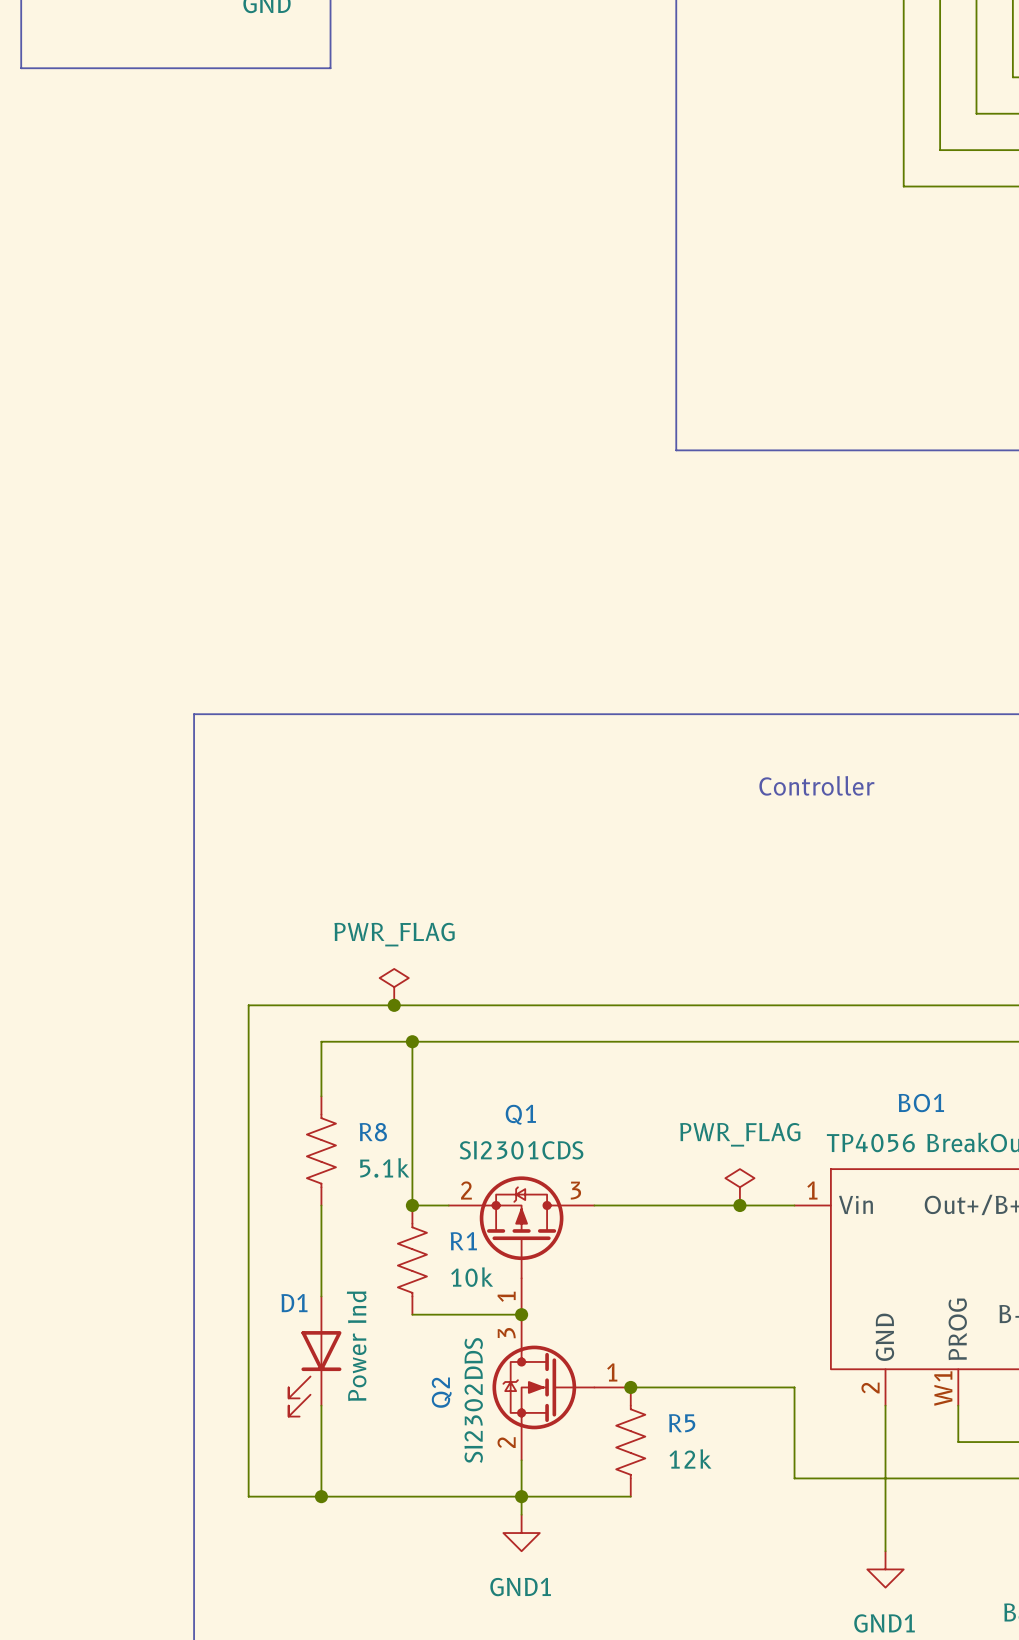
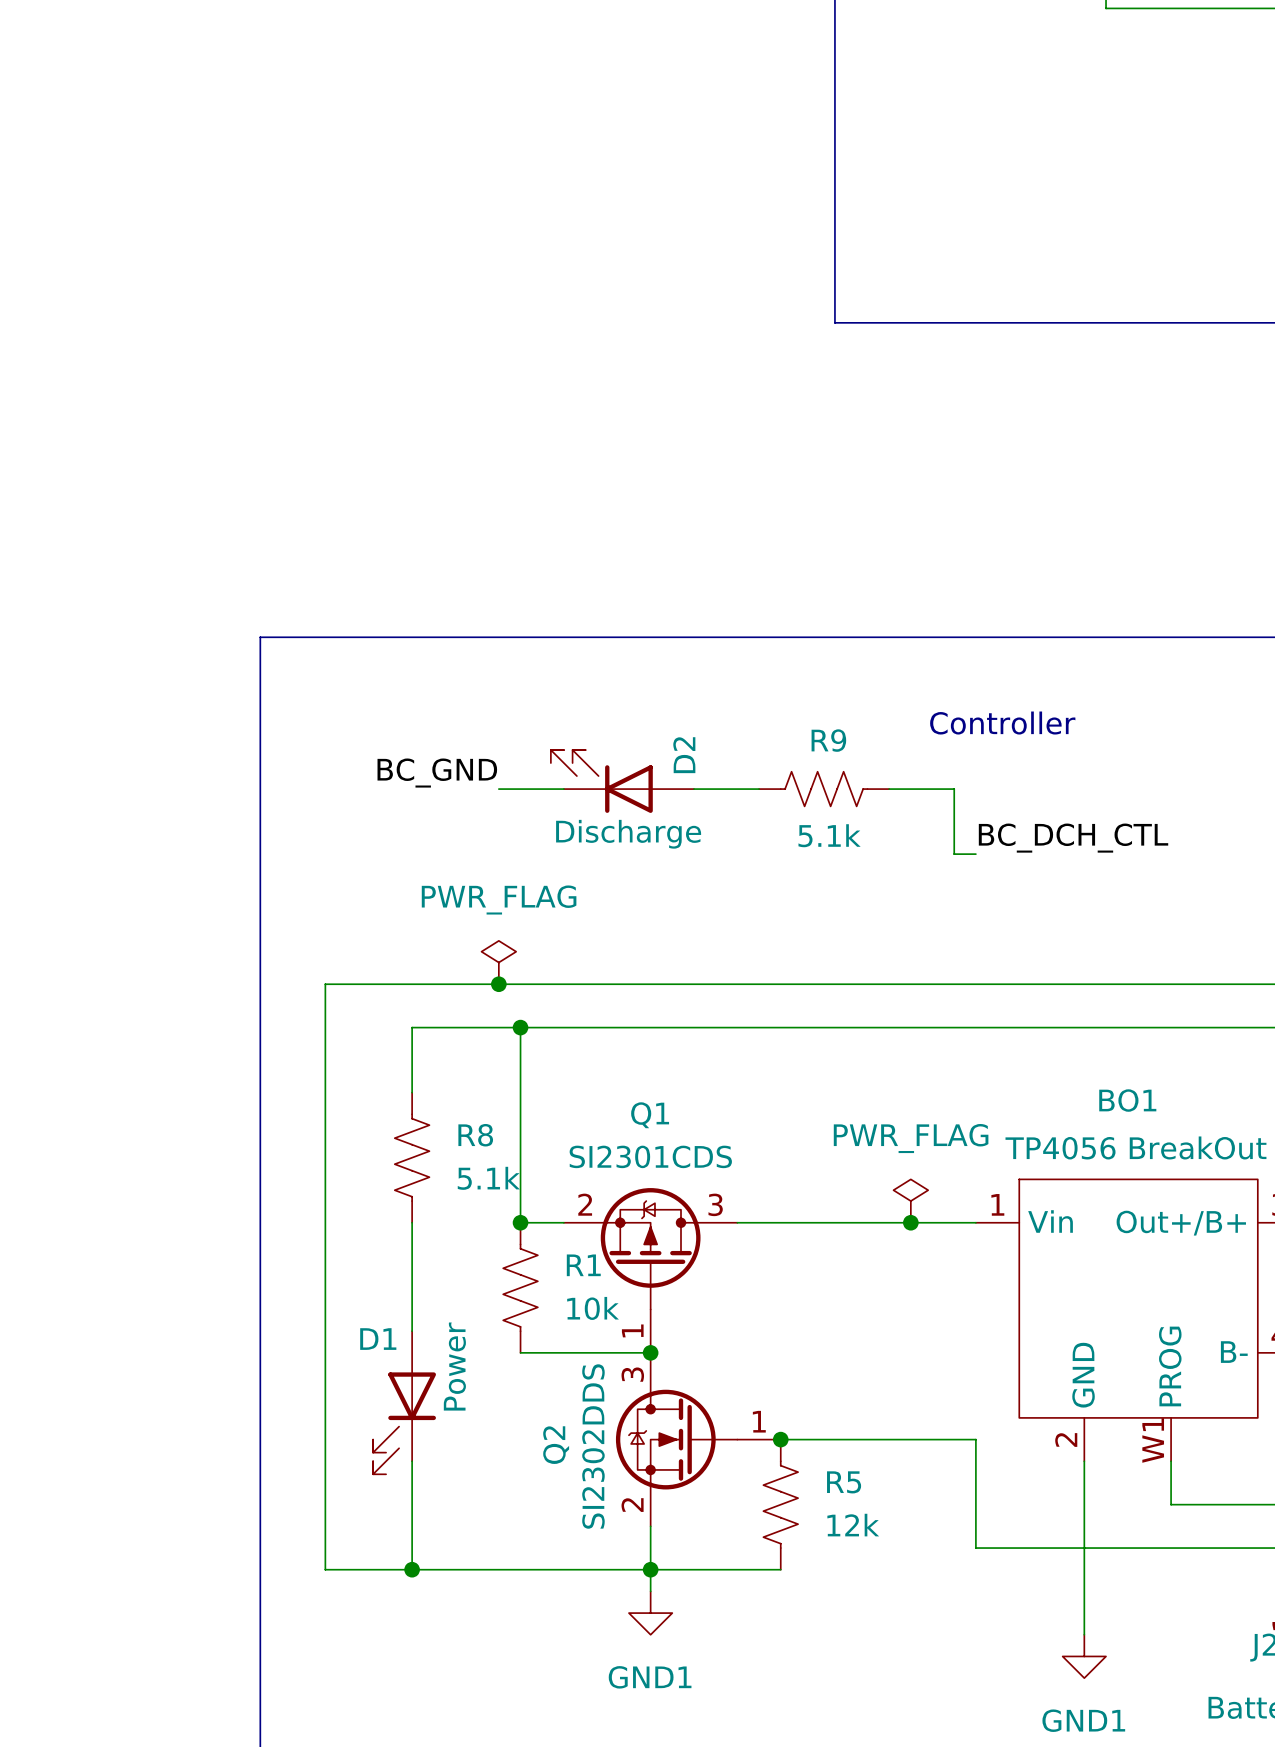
label: none -> BC_GND (437, 773)
D2: none -> Discharge (622, 781)
wire: none -> (498, 789) (563, 789)
wire: none -> (694, 789) (759, 789)
R9: none -> 5.1k (824, 789)
wire: none -> (889, 789) (954, 789) (954, 854) (975, 854)
label: none -> BC_DCH_CTL (1073, 838)
D1 value: Power Ind (356, 1346) -> Power (454, 1366)

